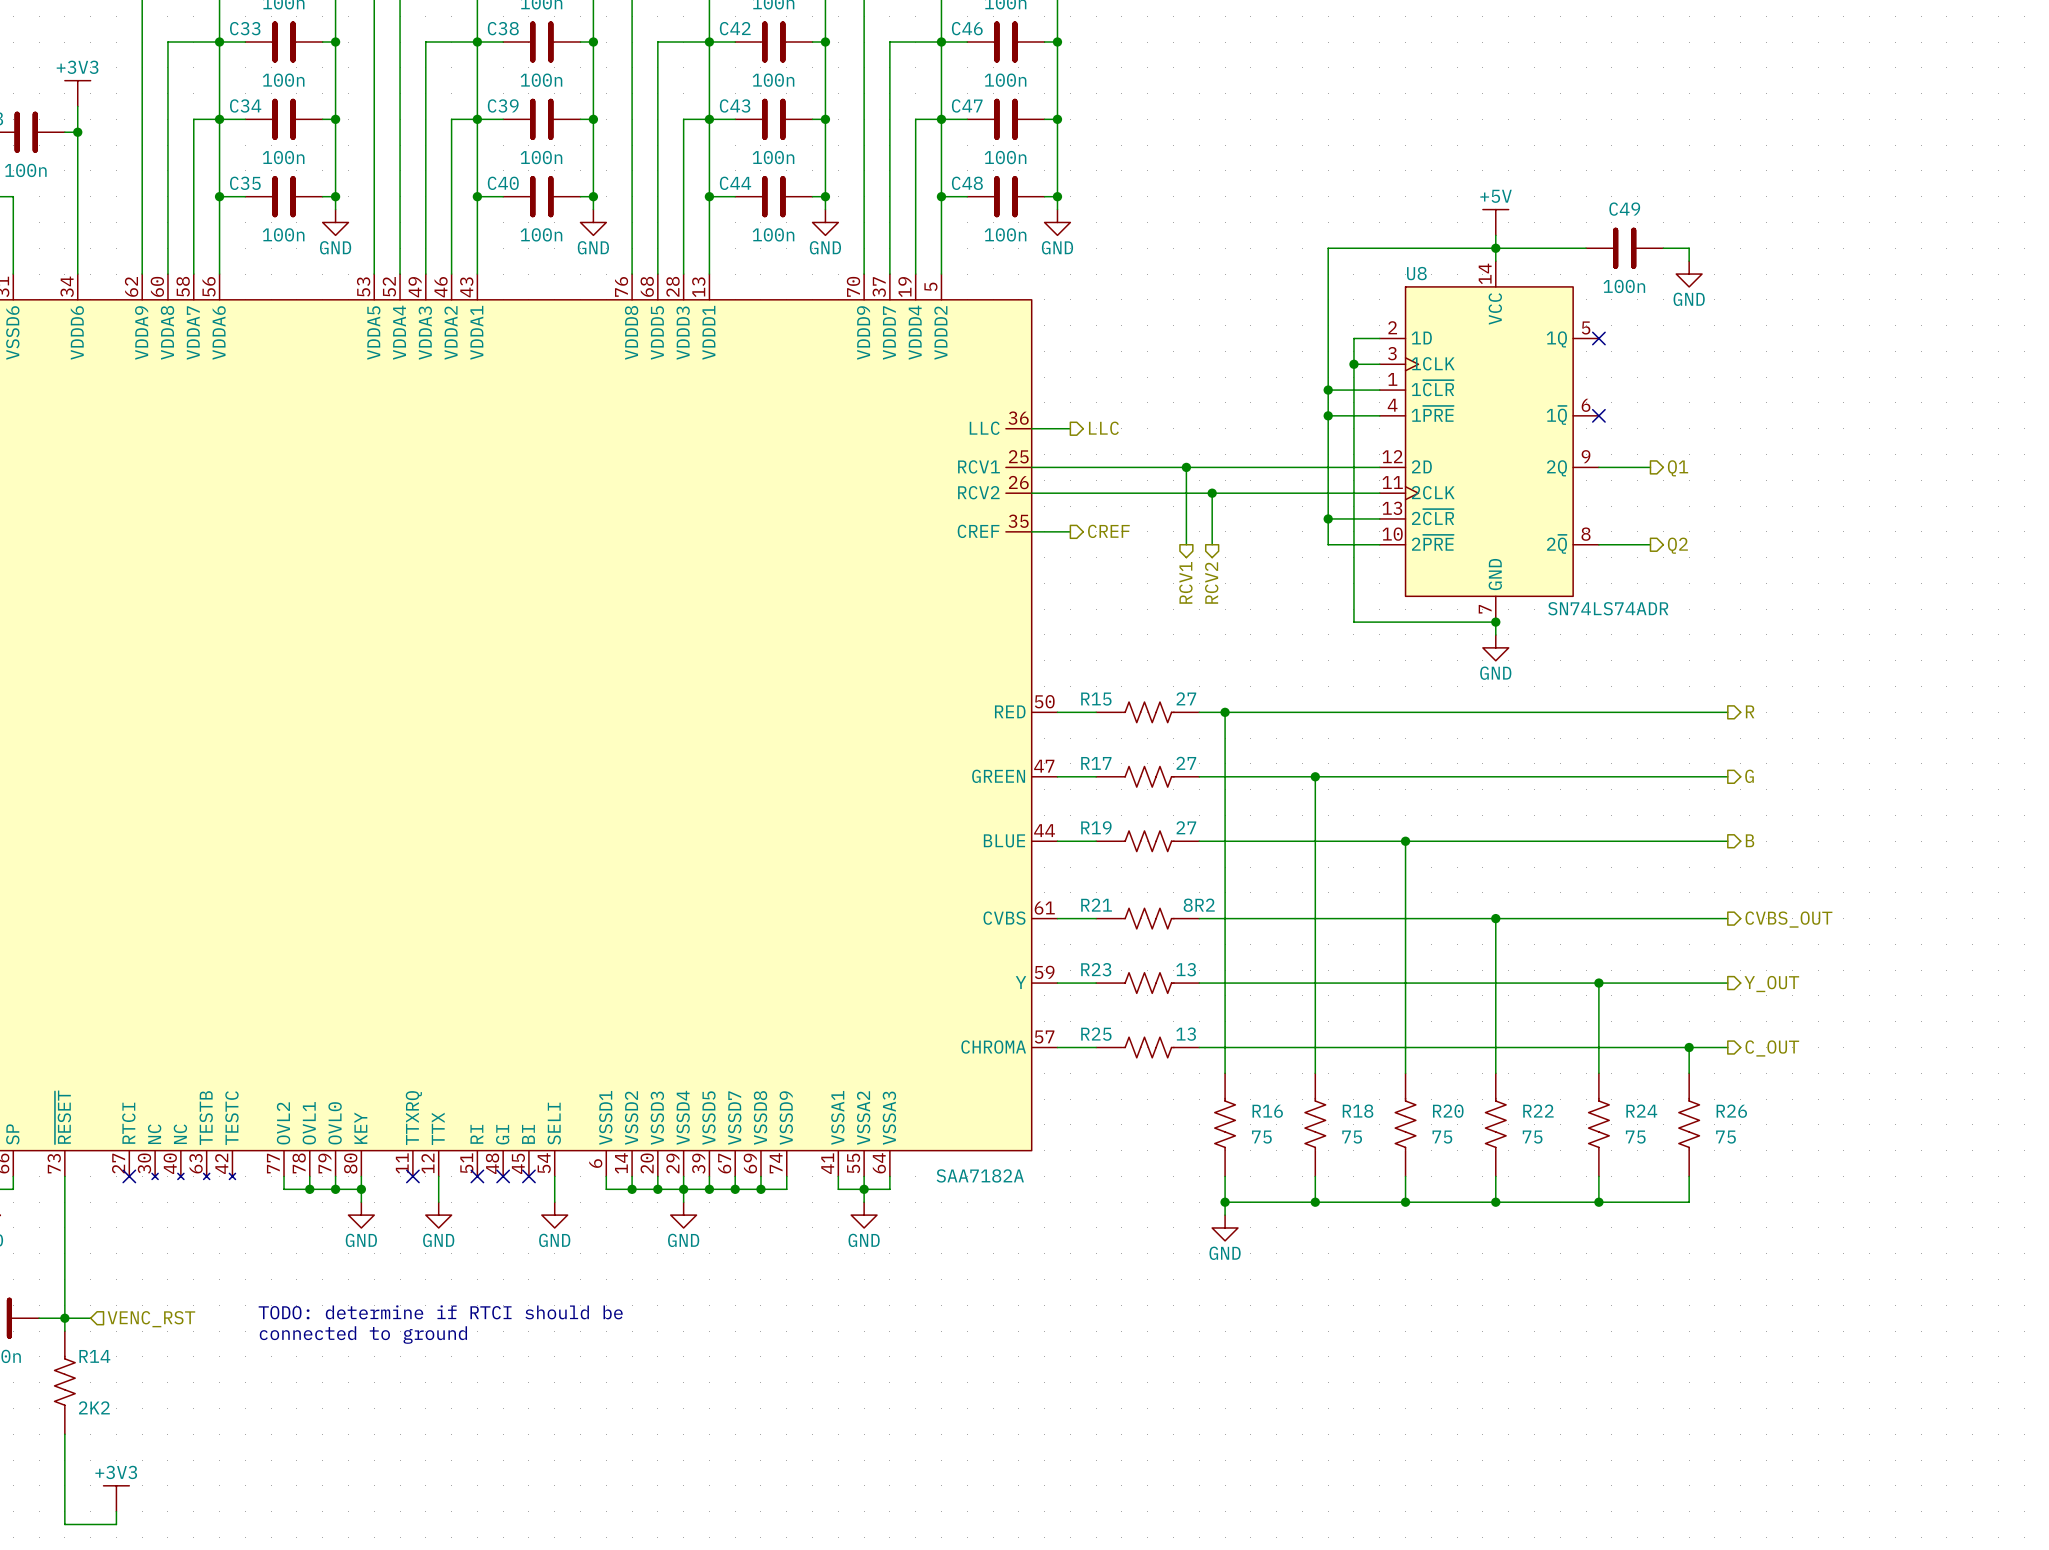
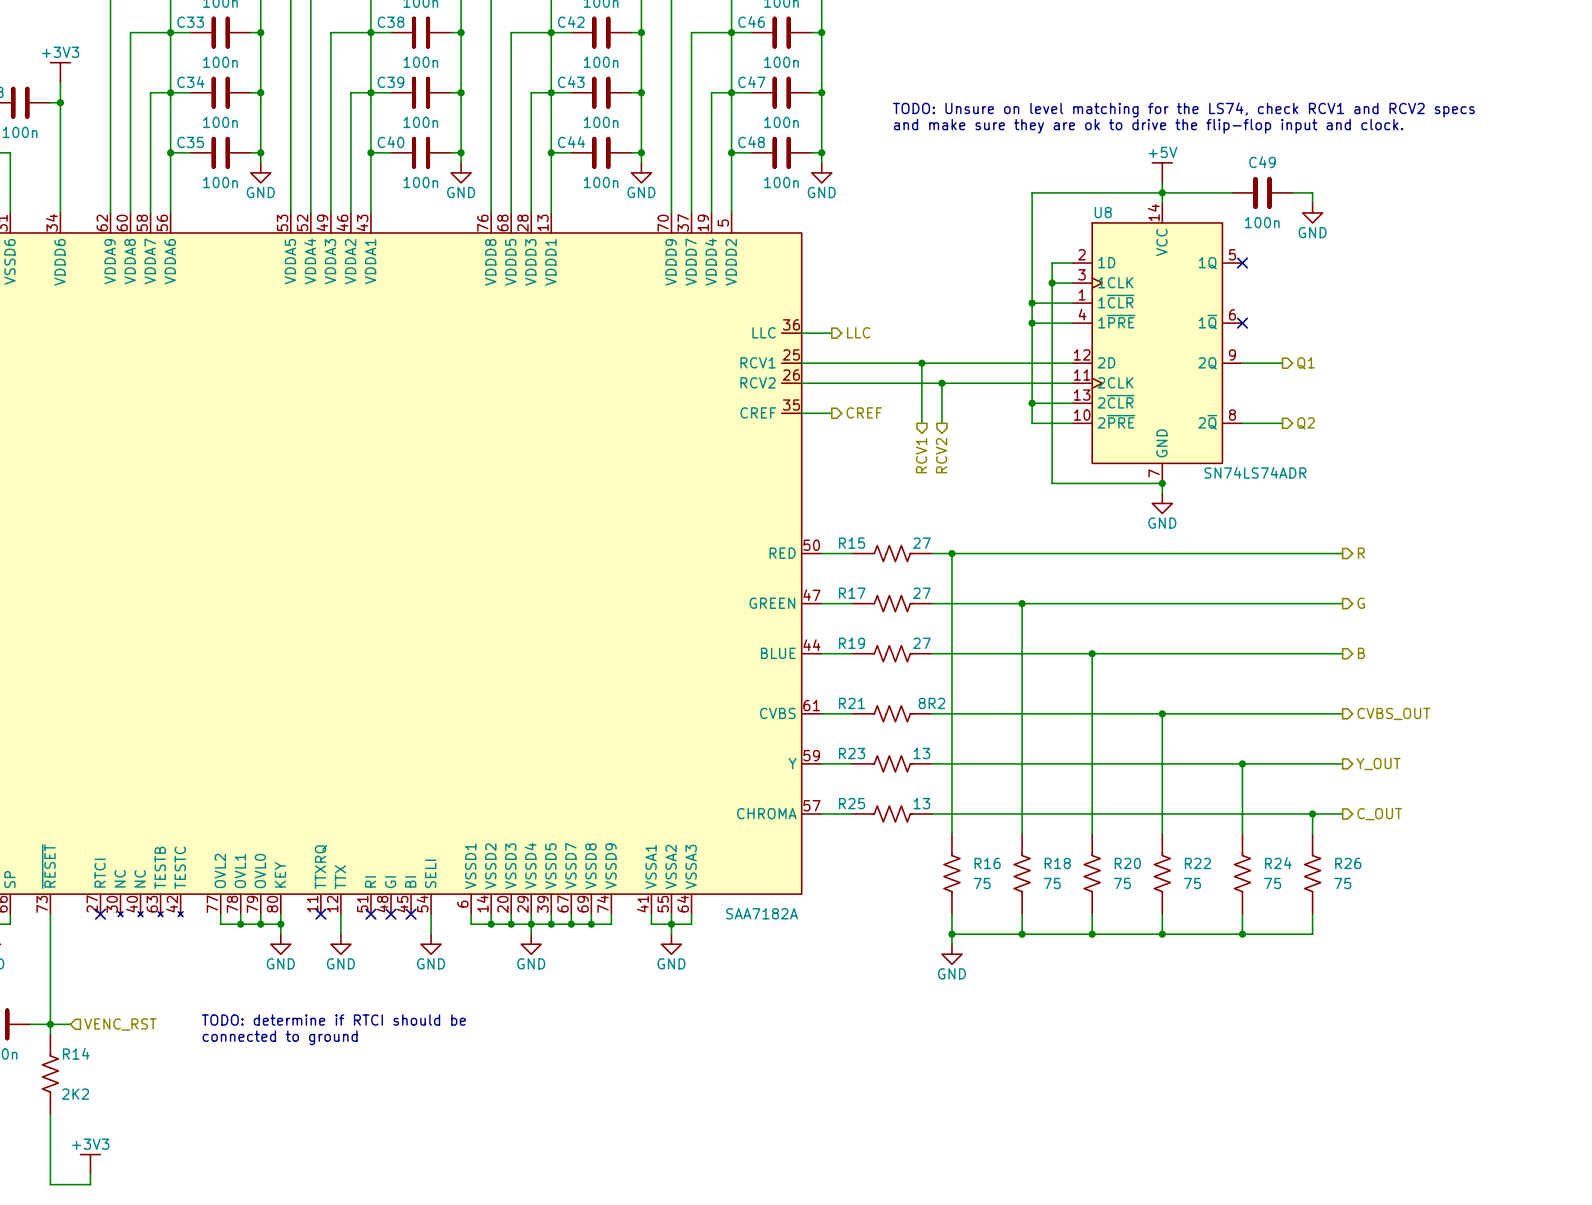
text: none -> TODO: Unsure on level matching for the LS74, check RCV1 and RCV2 specs (1183, 109)
text: none -> and make sure they are ok to drive the flip-flop input and clock. (1148, 126)

